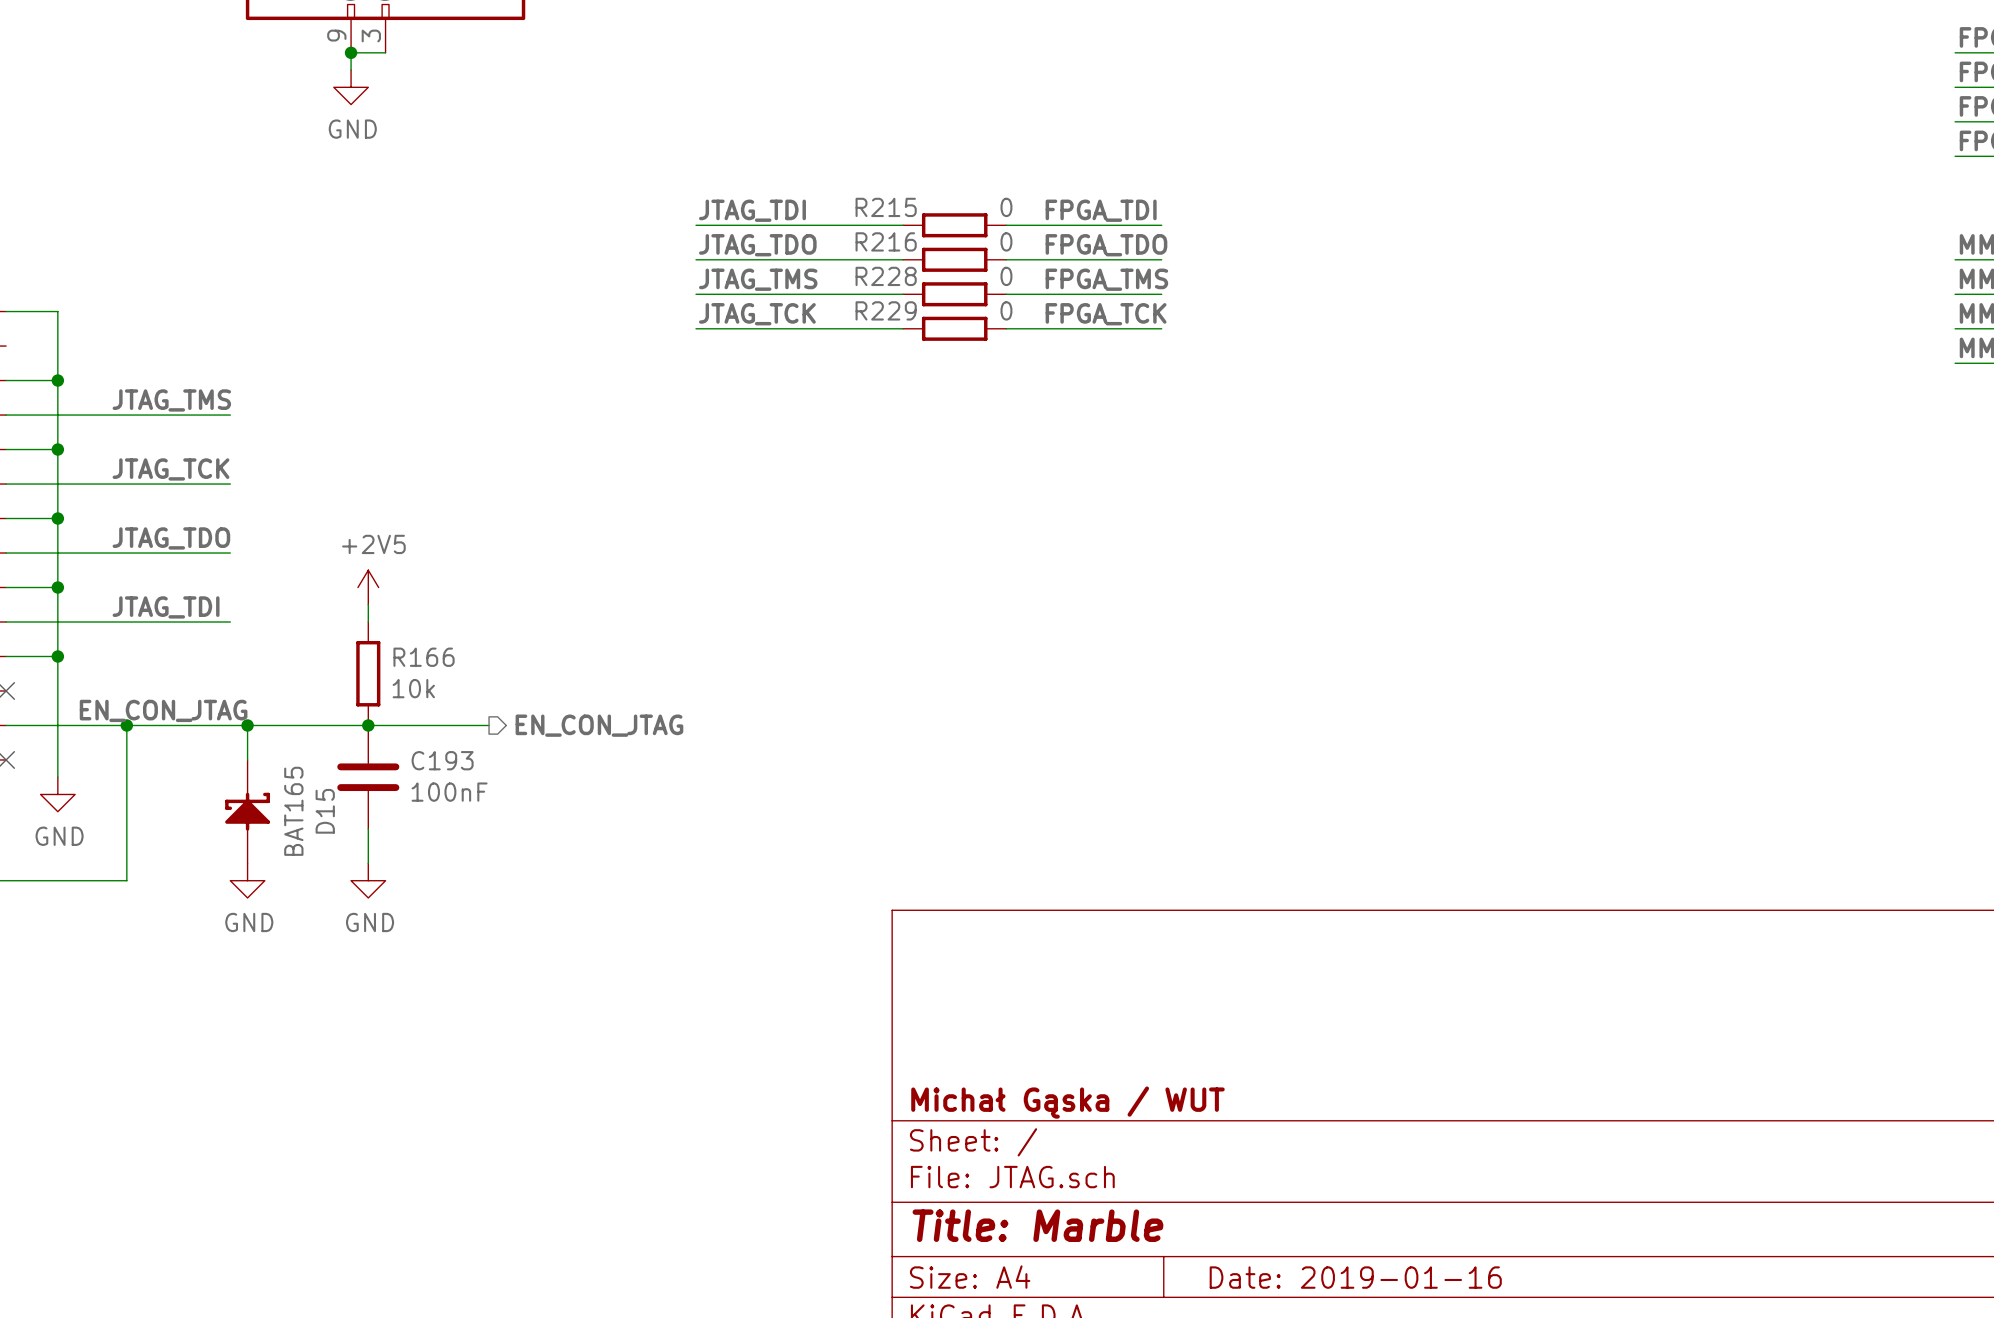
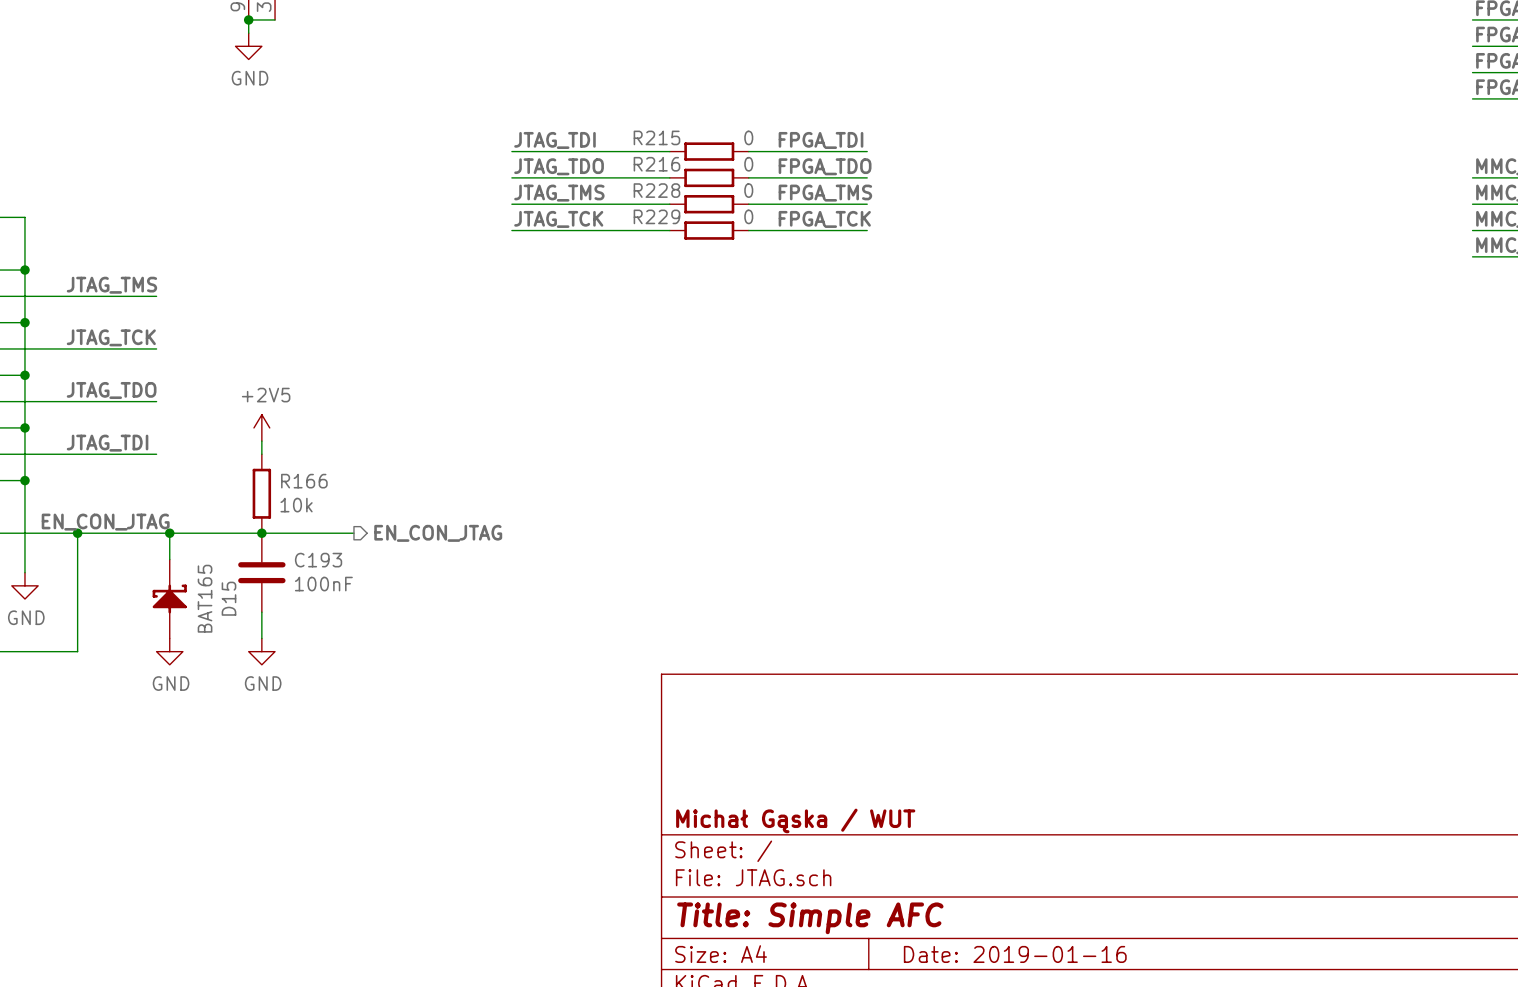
title block: Title: Marble (1037, 1225) -> Title: Simple AFC (810, 918)

